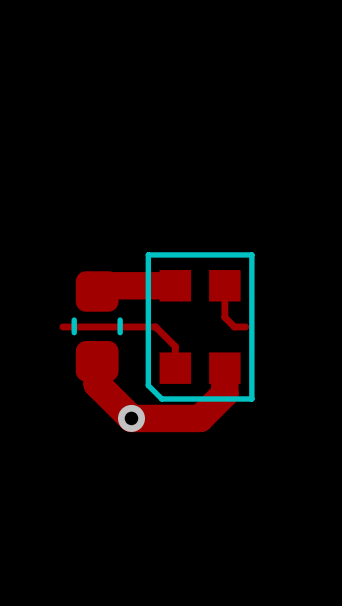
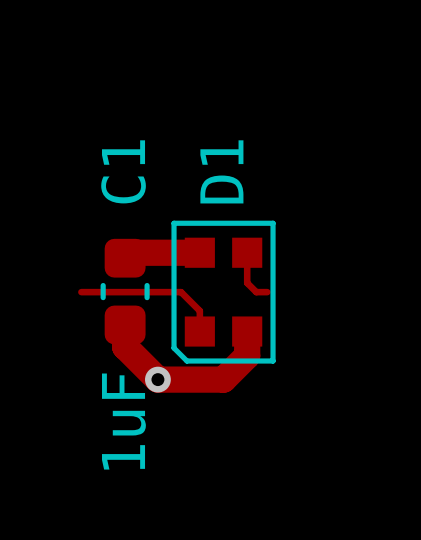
C1 name: none -> C1 (123, 171)
D1 name: none -> D1 (221, 171)
track: none -> (81, 292) (92, 292)
C1 value: none -> 1uF (123, 421)

